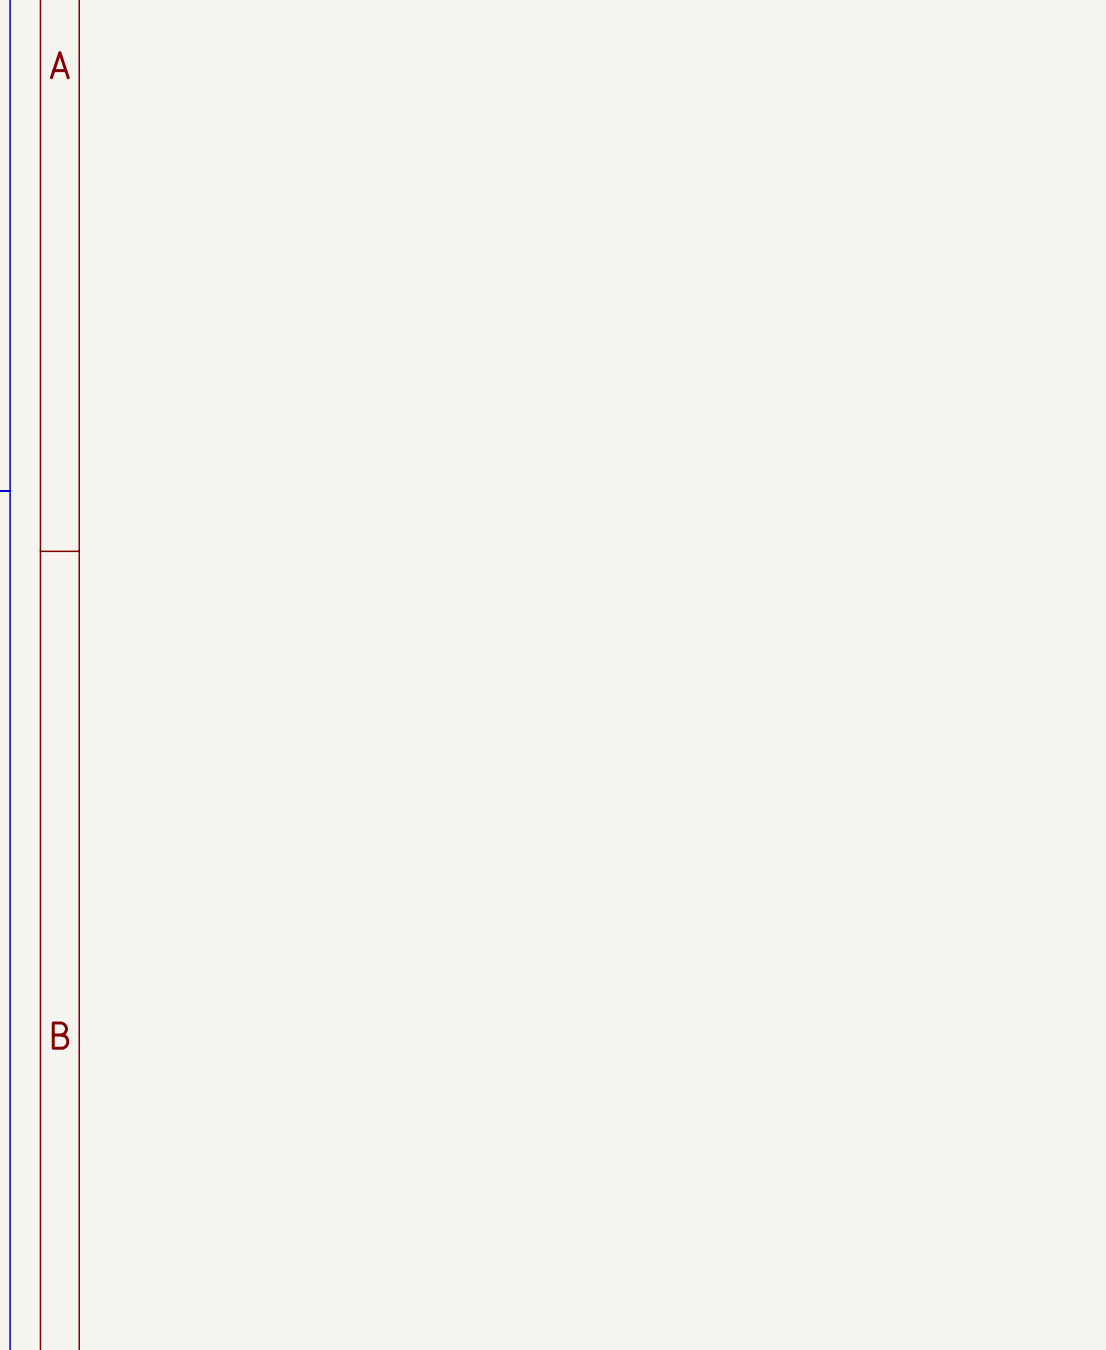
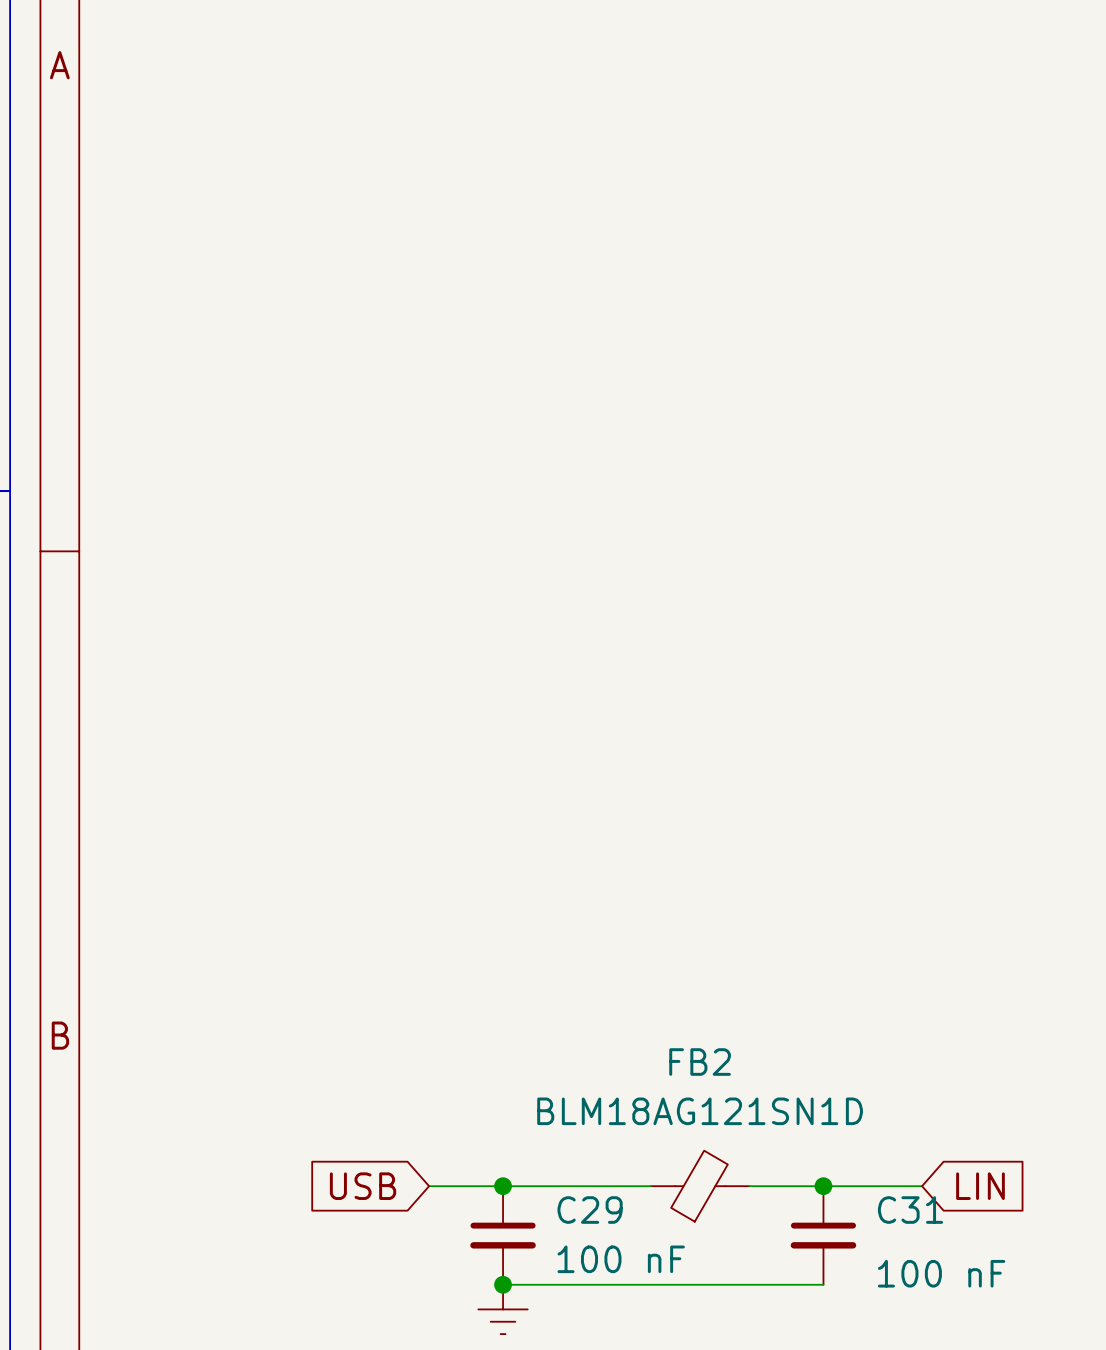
global label: none -> USB (363, 1186)
wire: none -> (429, 1186) (650, 1186)
junction: none -> (503, 1186)
FB2: none -> BLM18AG121SN1D (700, 1186)
wire: none -> (749, 1186) (922, 1186)
junction: none -> (823, 1186)
global label: none -> LIN (980, 1186)
C29: none -> 100 nF (503, 1235)
C31: none -> 100 nF (823, 1235)
wire: none -> (503, 1284) (823, 1284)
junction: none -> (503, 1284)
power symbol: none -> (503, 1309)

